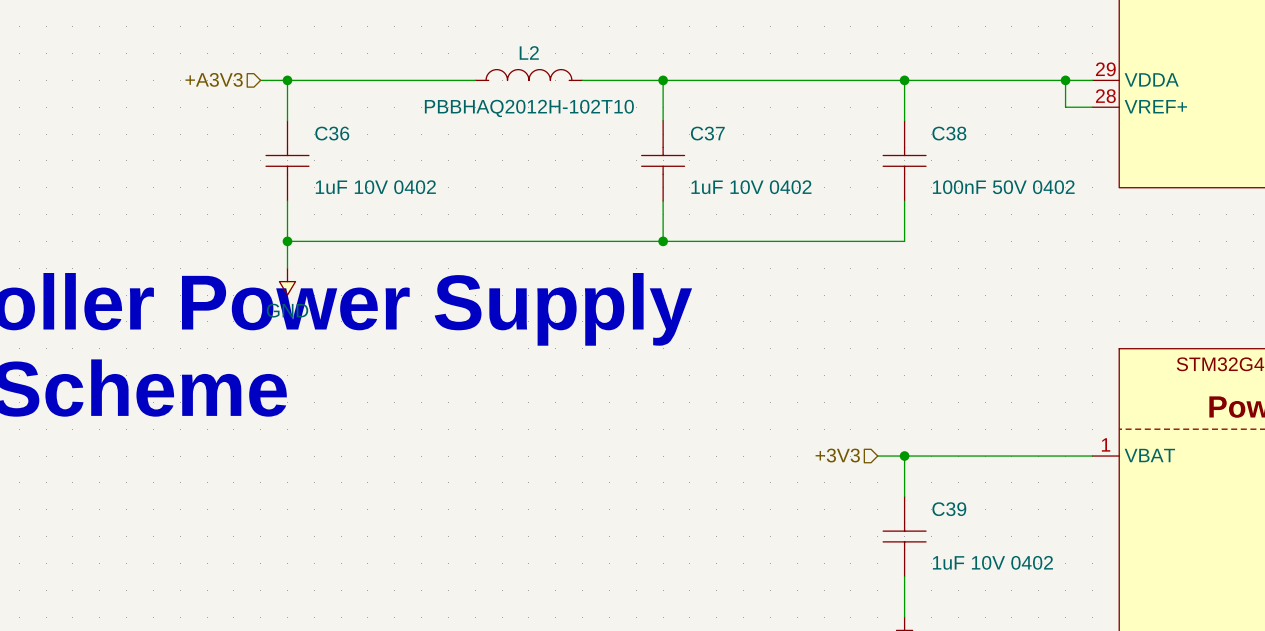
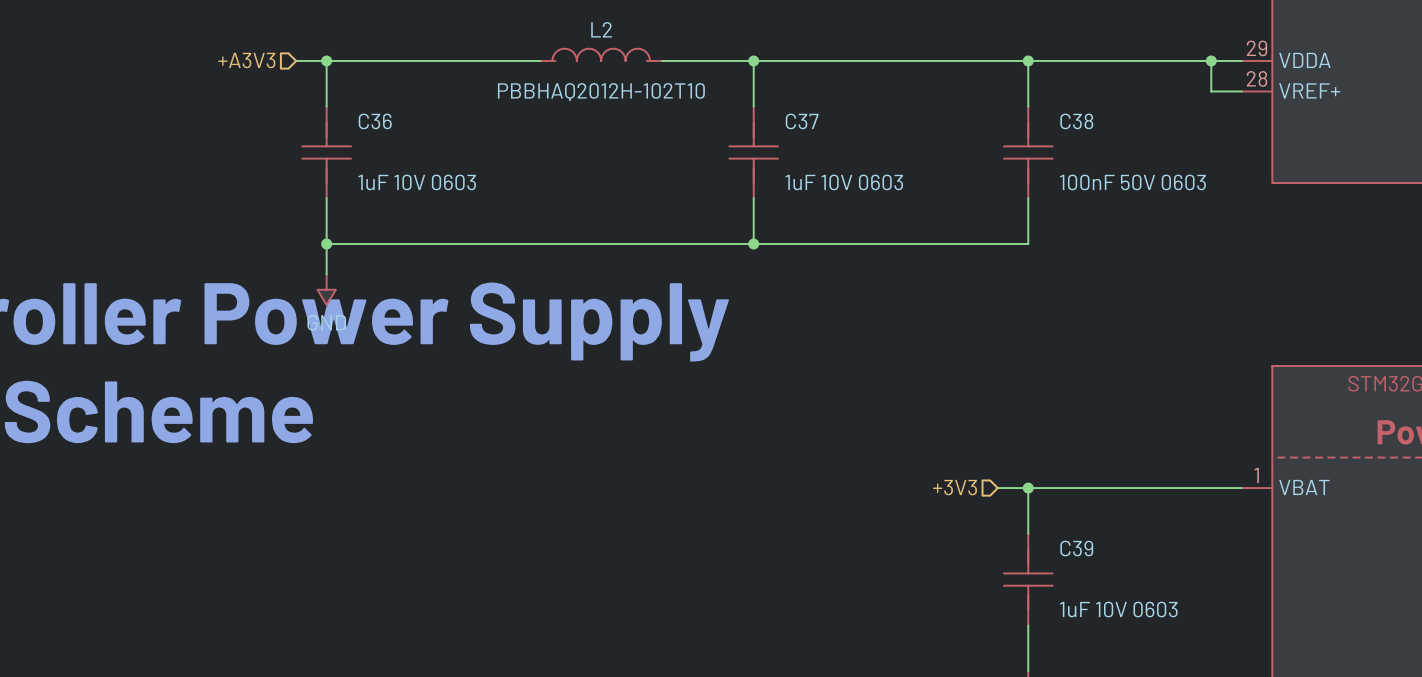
C36 symbol: [266, 120, 309, 202] -> [302, 106, 352, 199]
C37 symbol: [641, 120, 685, 202] -> [729, 106, 779, 199]
C38 symbol: [883, 120, 927, 202] -> [1003, 106, 1053, 199]
C36 value: 1uF 10V 0402 (375, 187) -> 1uF 10V 0603 (417, 182)
C37 value: 1uF 10V 0402 (751, 187) -> 1uF 10V 0603 (844, 182)
C38 value: 100nF 50V 0402 (1003, 187) -> 100nF 50V 0603 (1132, 182)
C39 symbol: [883, 496, 927, 577] -> [1003, 533, 1053, 626]
C39 value: 1uF 10V 0402 (992, 562) -> 1uF 10V 0603 (1118, 609)

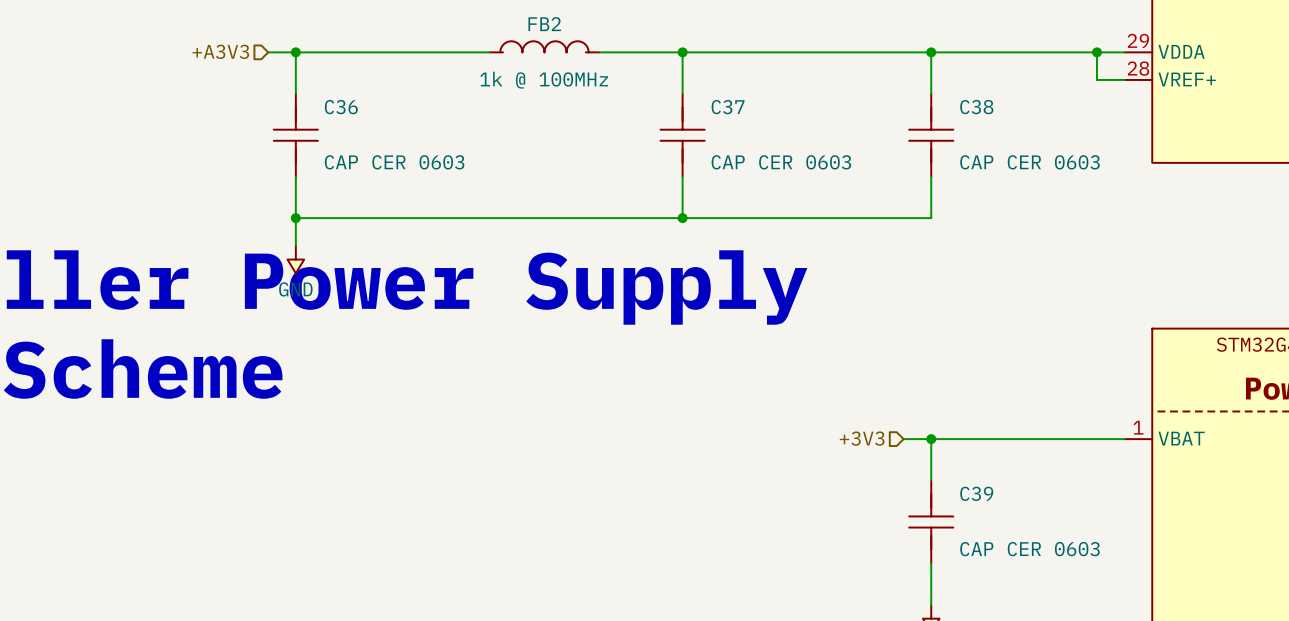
L2 name: L2 (601, 29) -> FB2 (544, 24)
L2 value: PBBHAQ2012H-102T10 (601, 92) -> 1k @ 100MHz (544, 80)
C36 value: 1uF 10V 0603 (417, 182) -> CAP CER 0603 (394, 162)
C37 value: 1uF 10V 0603 (844, 182) -> CAP CER 0603 (781, 162)
C38 value: 100nF 50V 0603 (1132, 182) -> CAP CER 0603 (1029, 162)
C39 value: 1uF 10V 0603 (1118, 609) -> CAP CER 0603 (1029, 549)

